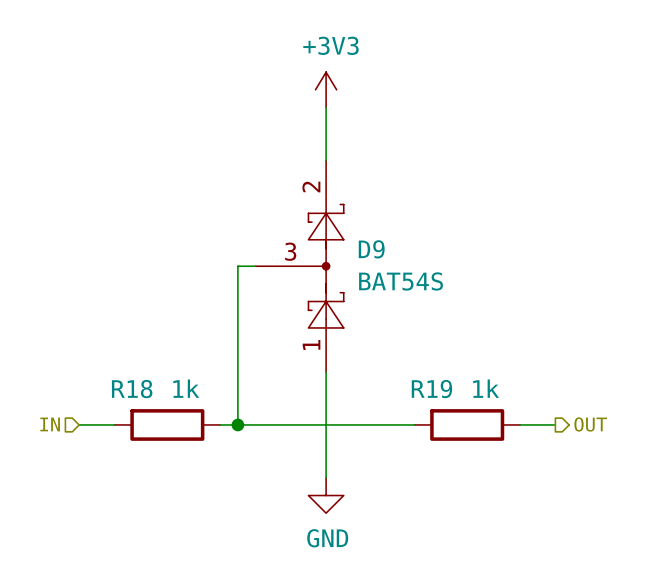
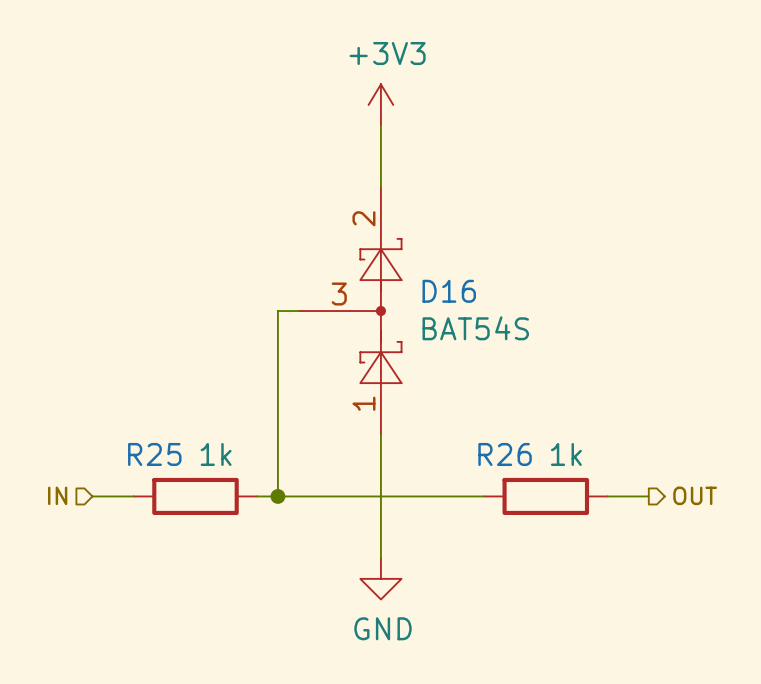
D9 name: D9 (371, 249) -> D16 (449, 291)
R18 name: R18 (132, 389) -> R25 (154, 454)
R19 name: R19 (431, 389) -> R26 (505, 454)

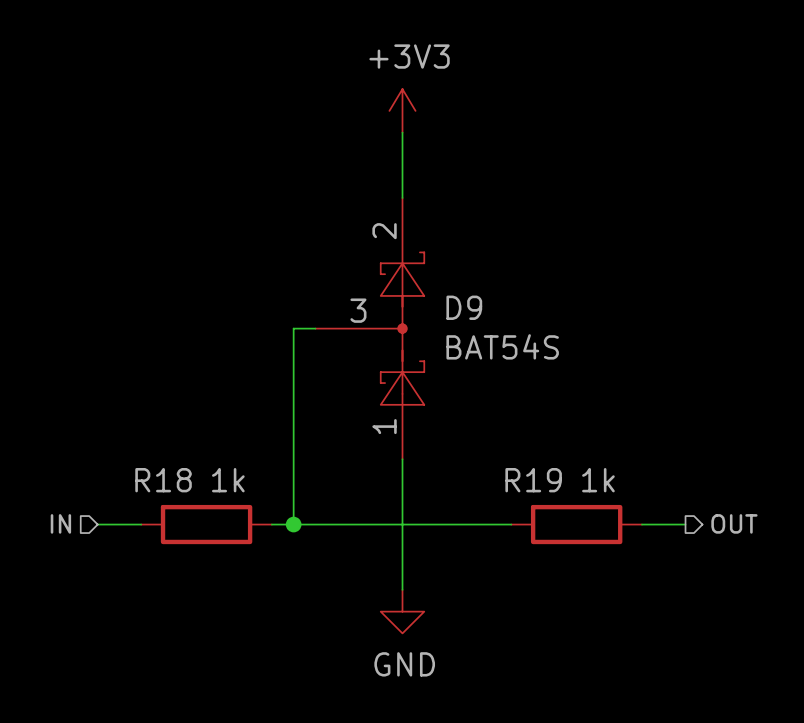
D16 name: D16 (449, 291) -> D9 (464, 307)
R25 name: R25 (154, 454) -> R18 (163, 480)
R26 name: R26 (505, 454) -> R19 (533, 480)

